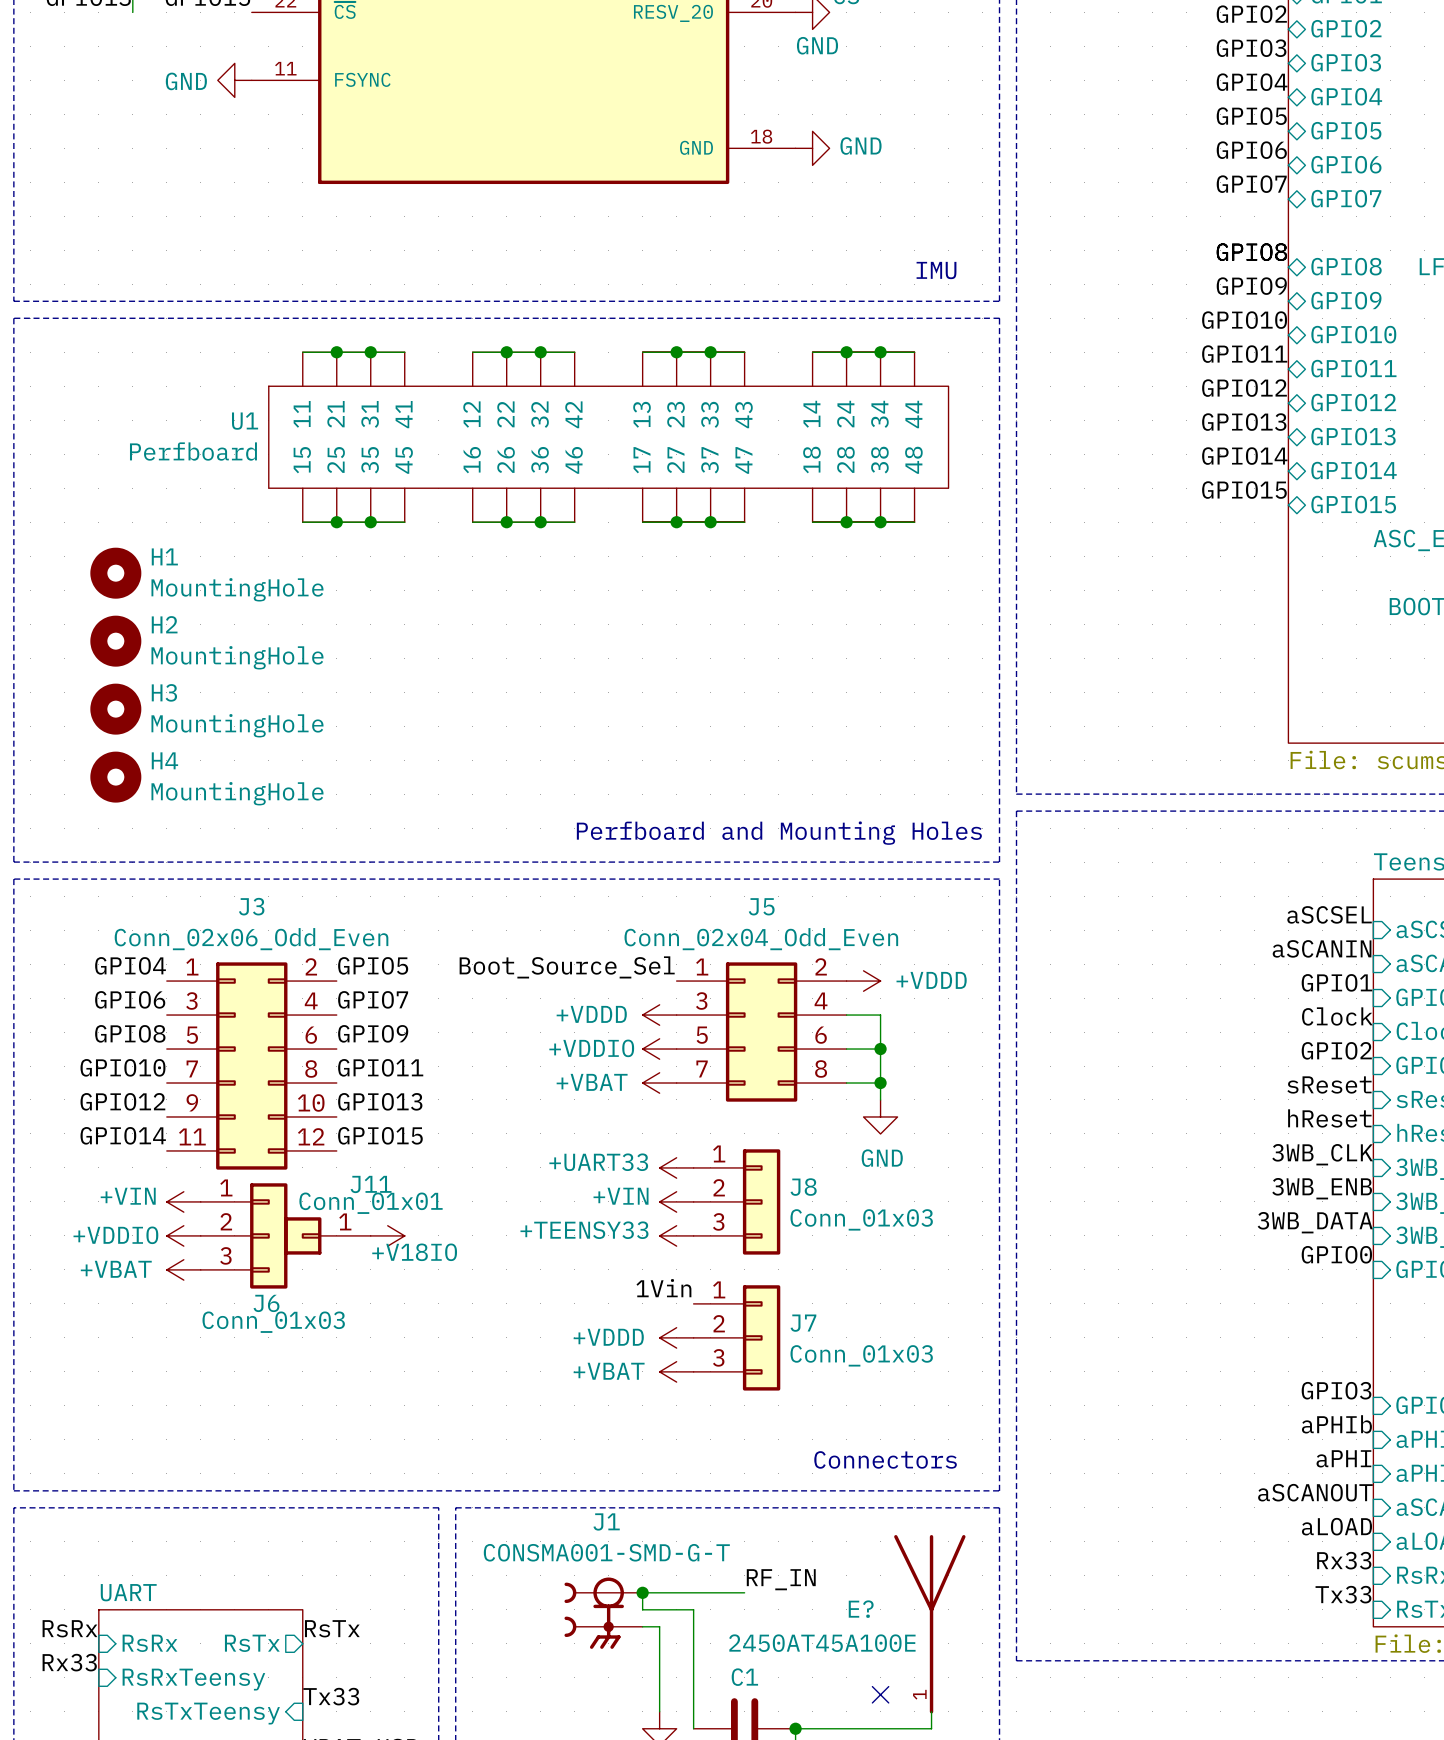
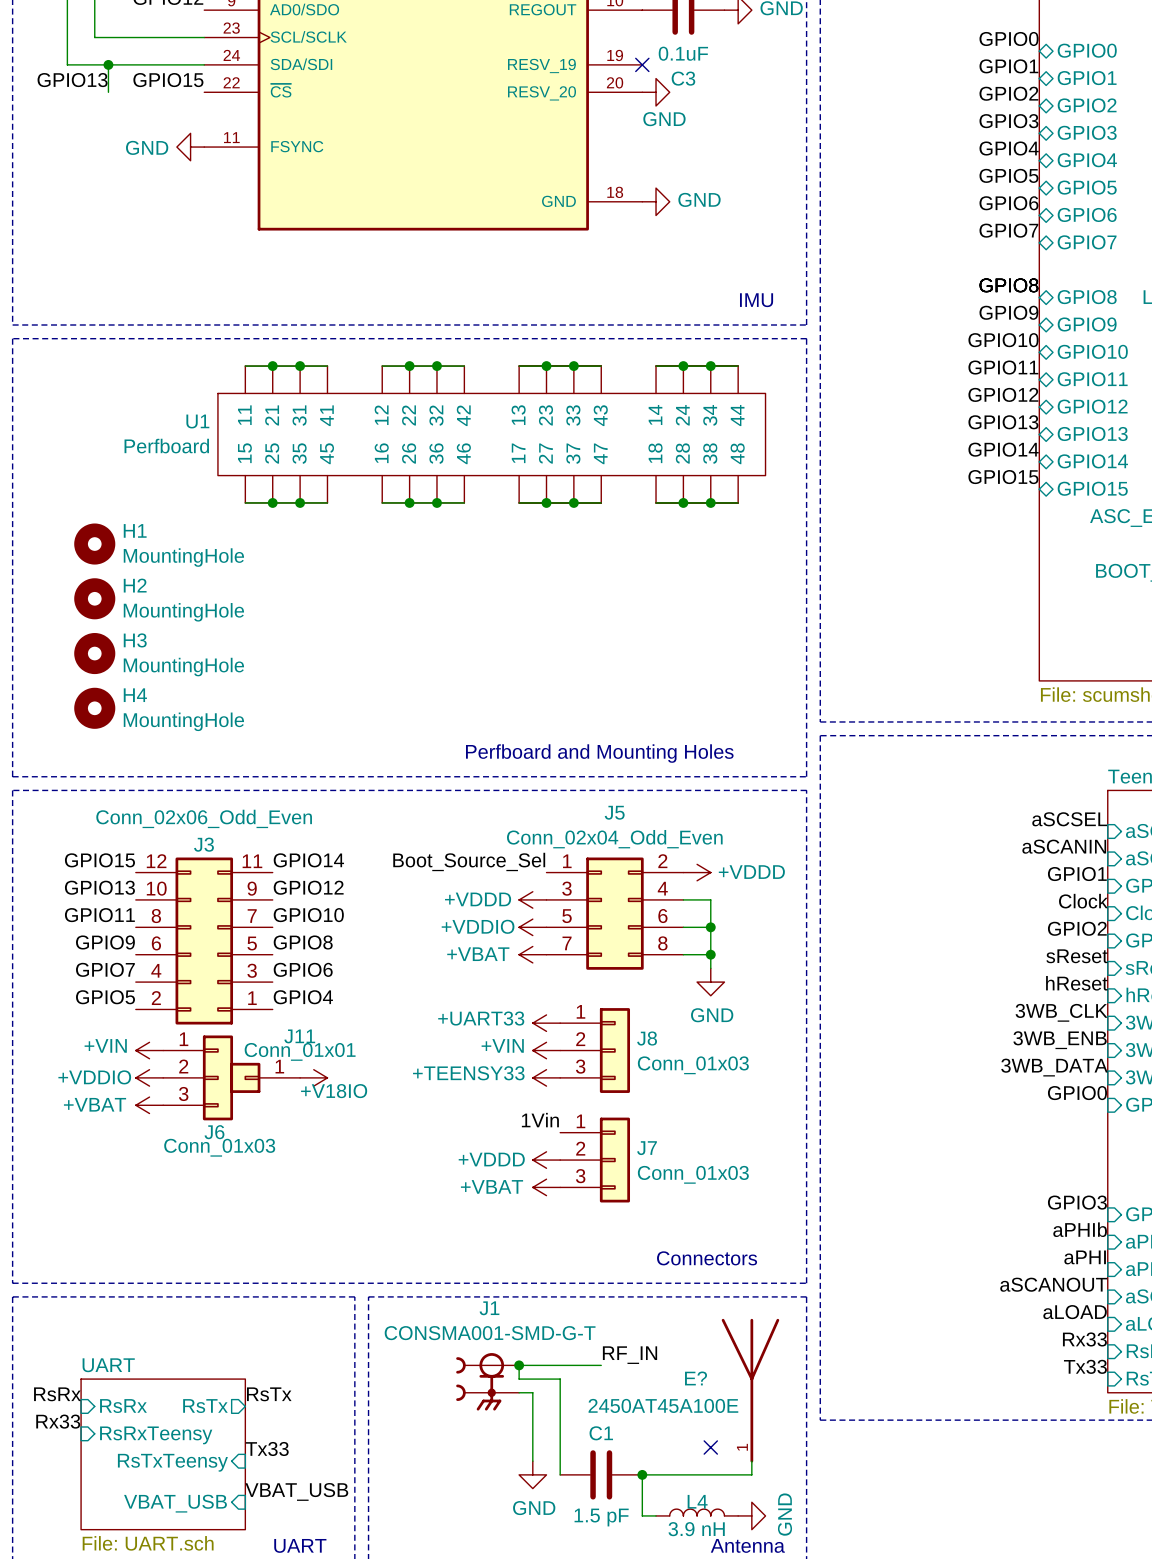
J3 name position: J3 (251, 906) -> J3 (203, 844)
label: GPIO4 (130, 965) -> GPIO15 (99, 860)
label: GPIO5 (373, 965) -> GPIO14 (308, 860)
label: GPIO6 (130, 999) -> GPIO13 (99, 887)
label: GPIO7 (373, 999) -> GPIO12 (308, 887)
label: GPIO8 (130, 1033) -> GPIO11 (99, 915)
label: GPIO9 (373, 1033) -> GPIO10 (308, 915)
J3 rotation: 0° (251, 1066) -> 180° (204, 941)
label: GPIO10 (122, 1067) -> GPIO9 (105, 942)
label: GPIO11 (380, 1067) -> GPIO8 (303, 942)
label: GPIO12 (122, 1101) -> GPIO7 (105, 969)
label: GPIO13 (380, 1101) -> GPIO6 (303, 969)
label: GPIO14 (123, 1135) -> GPIO5 (105, 997)
label: GPIO15 (380, 1135) -> GPIO4 (303, 997)

